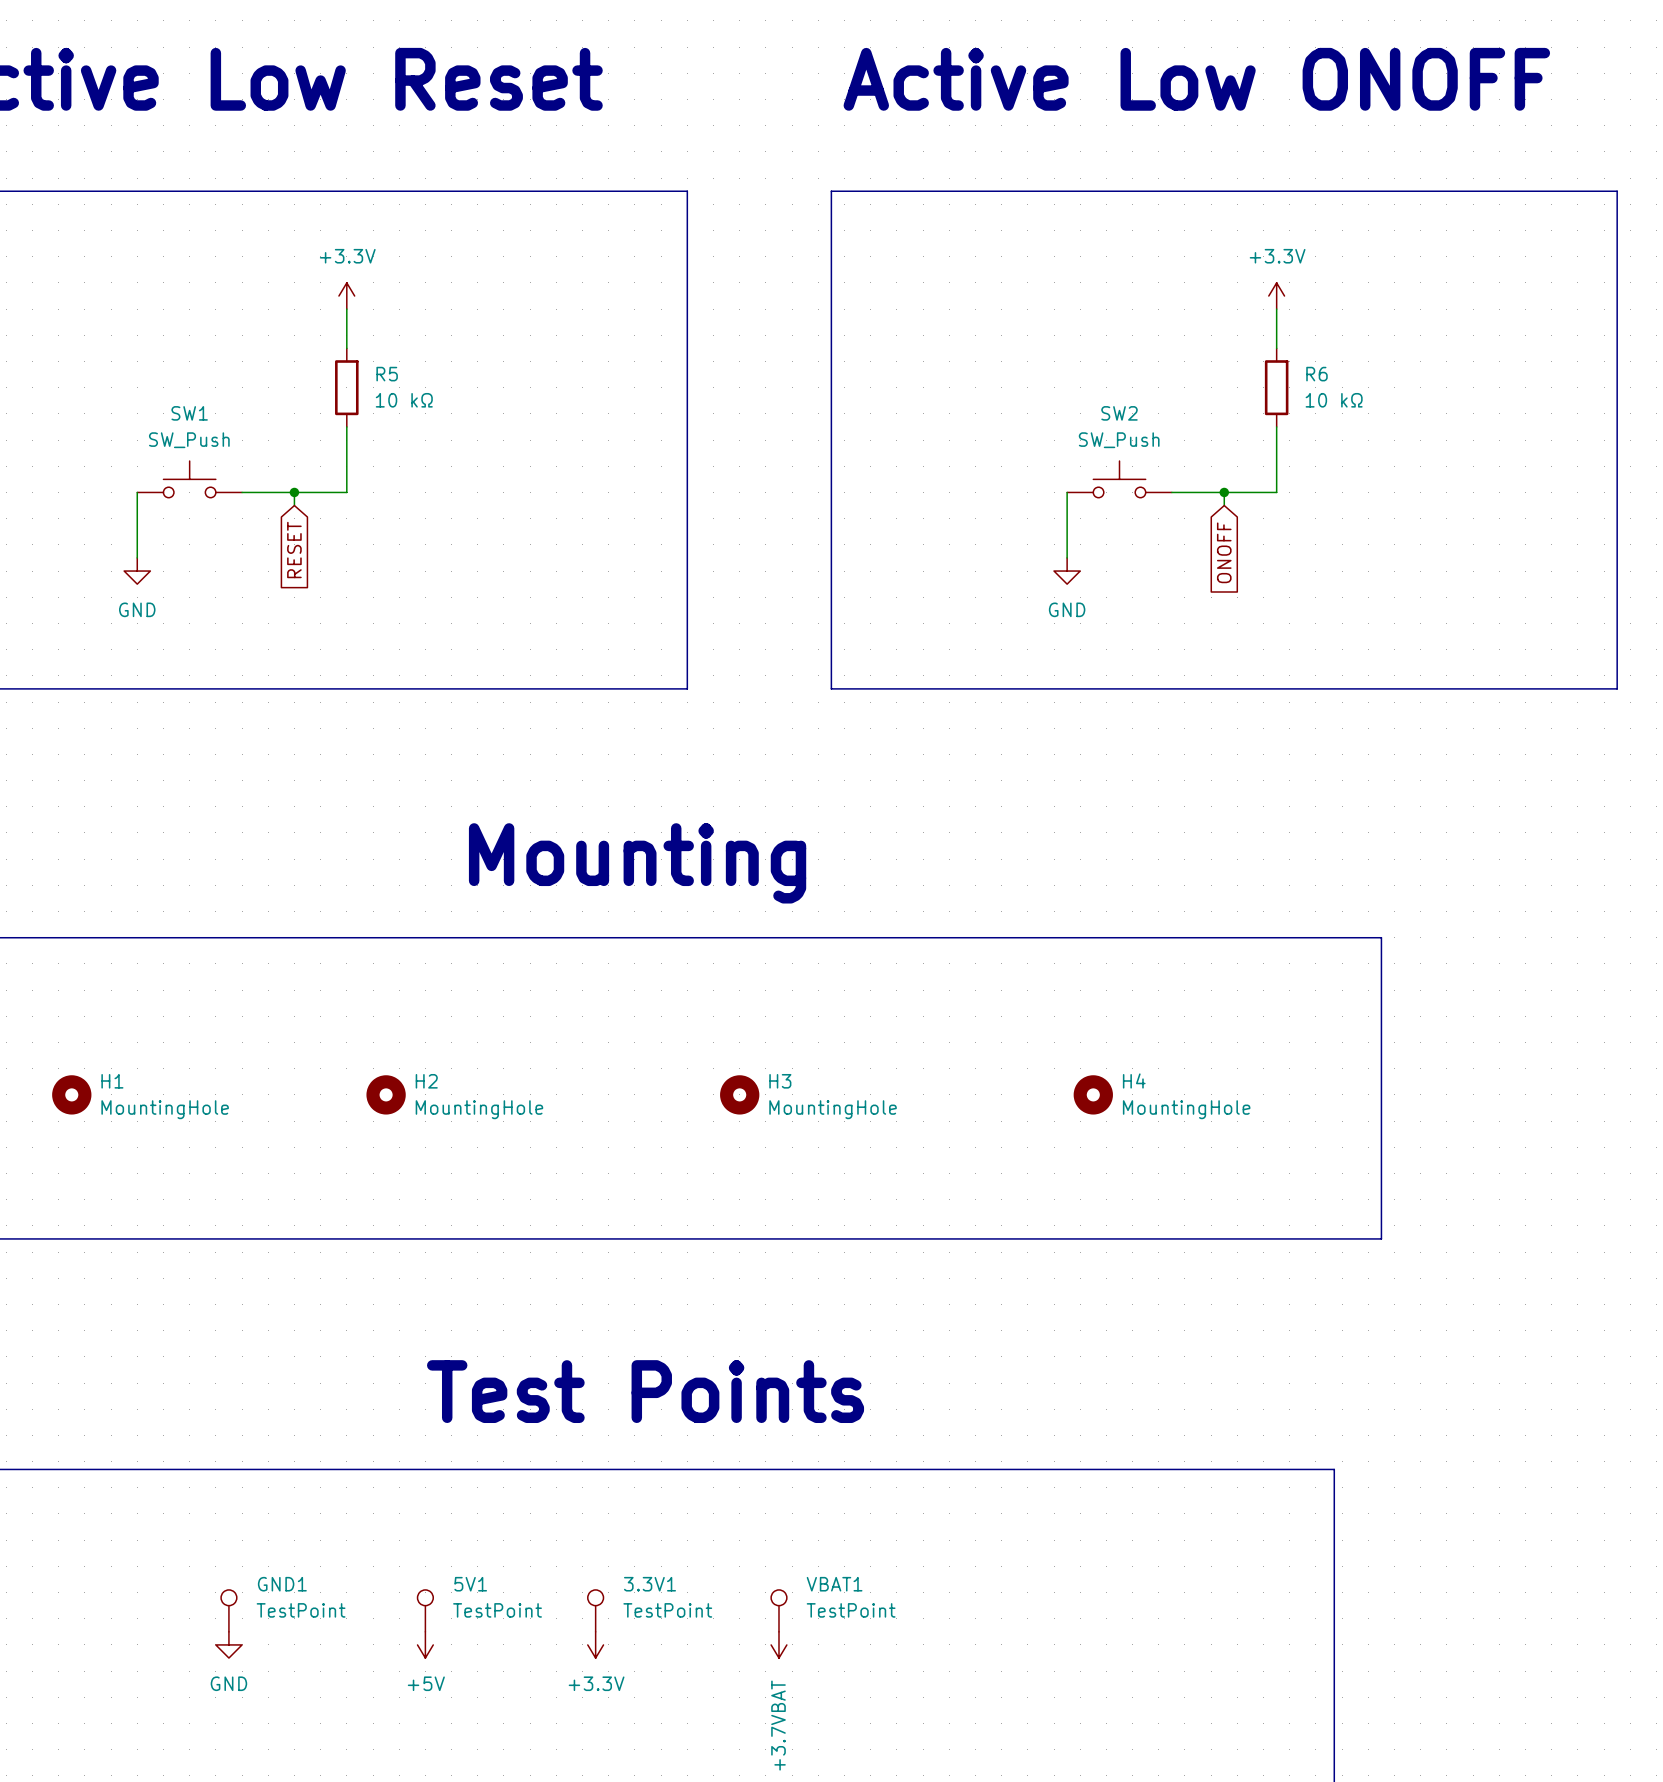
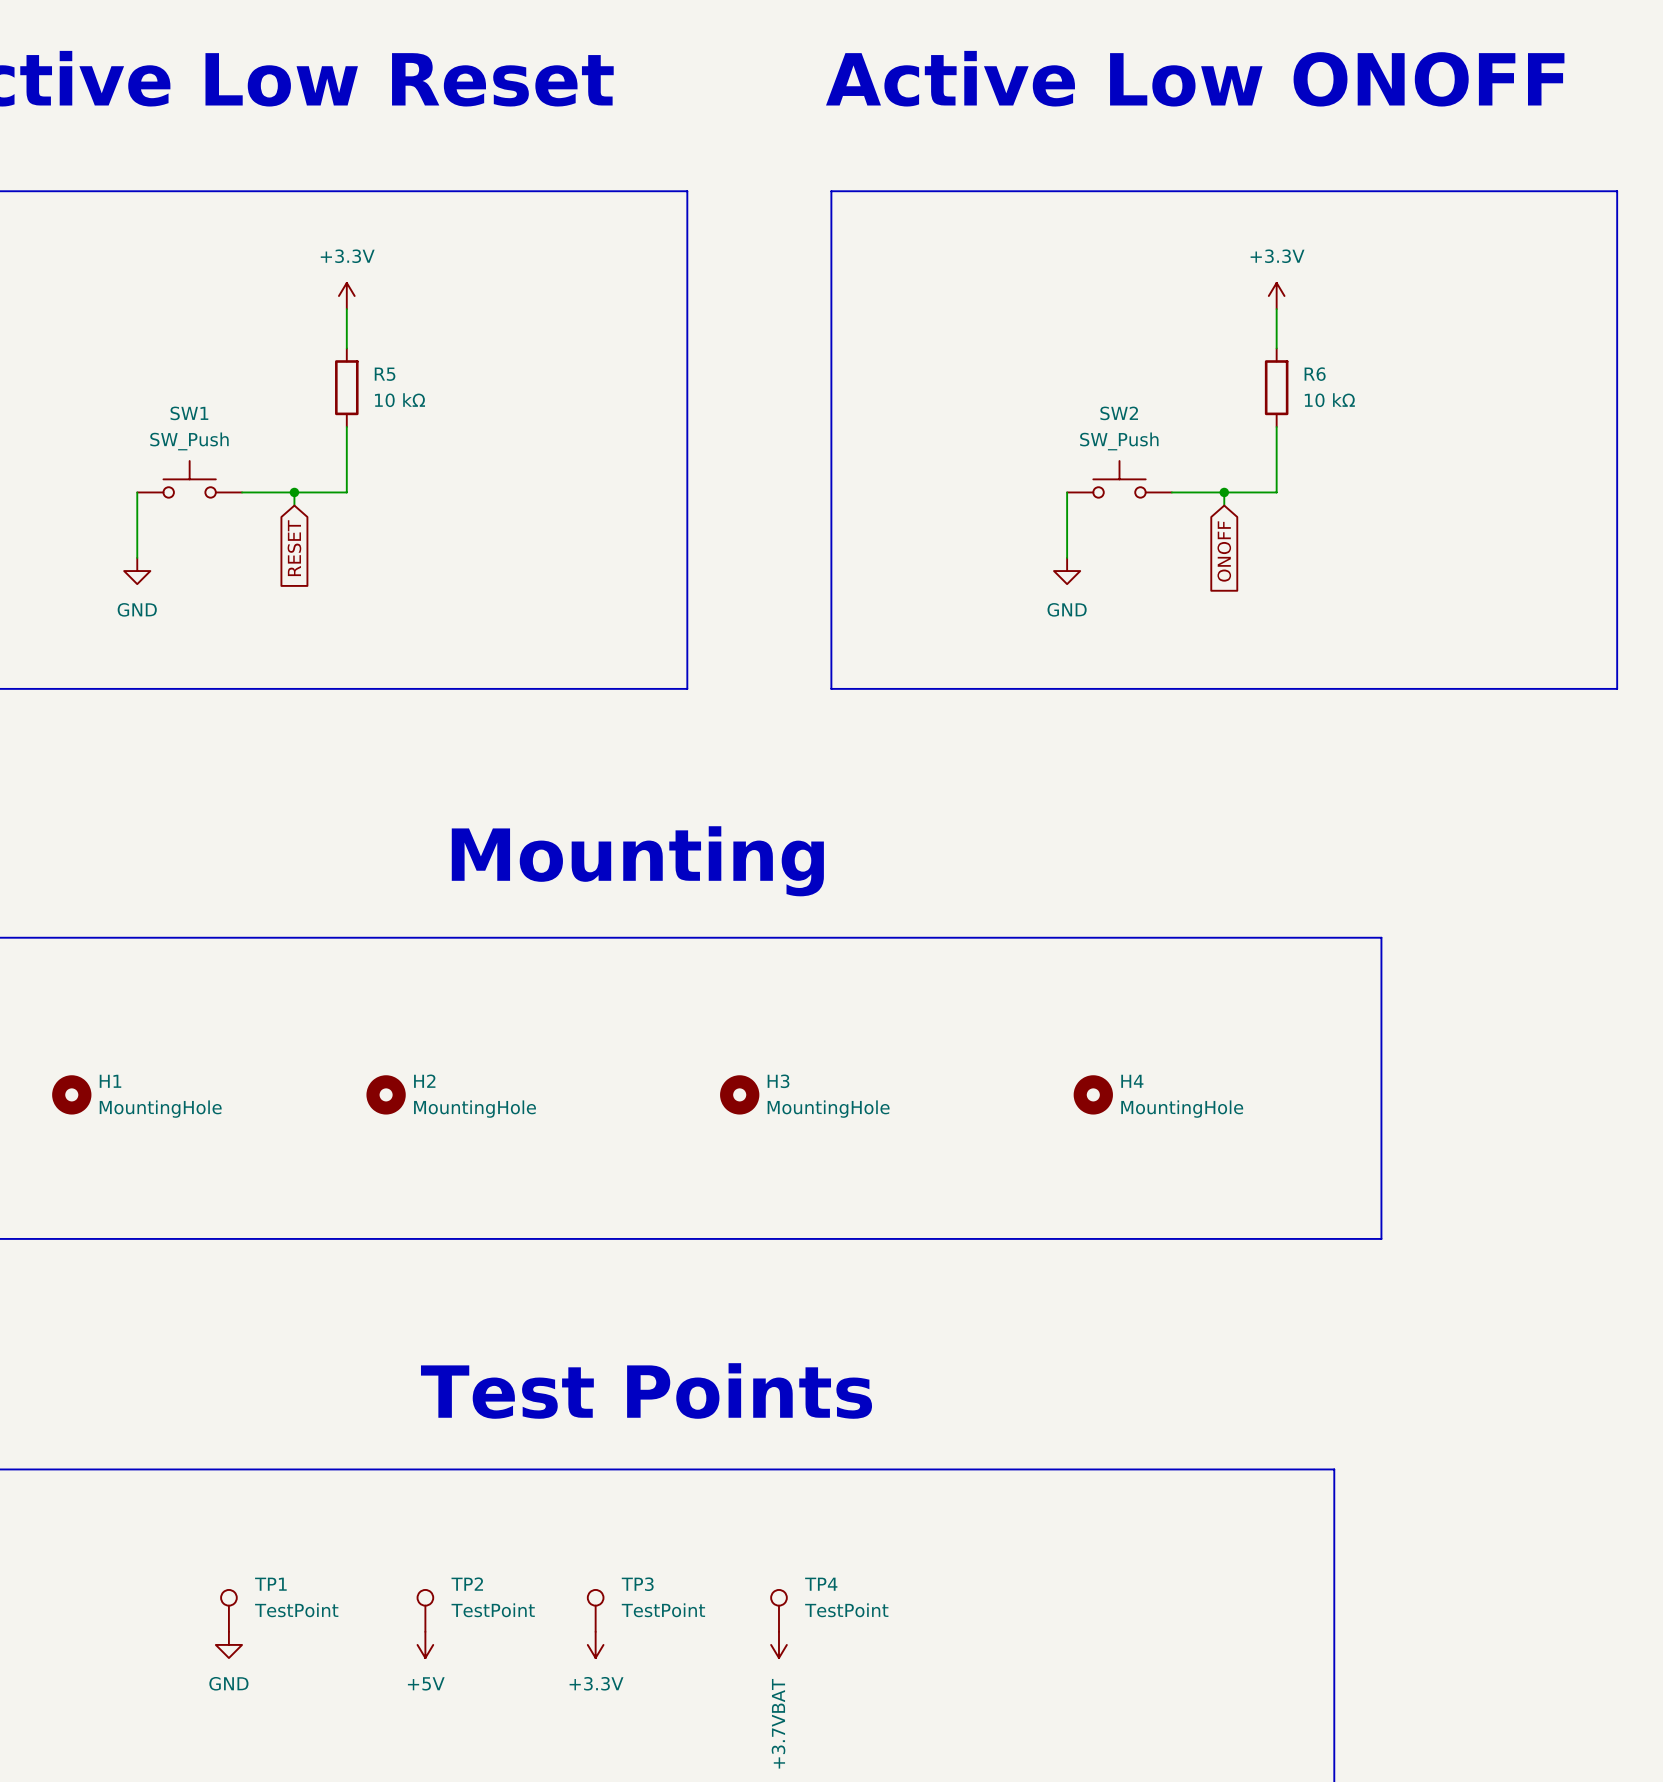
GND1 name: GND1 (282, 1584) -> TP1 (270, 1584)
5V1 name: 5V1 (470, 1584) -> TP2 (467, 1584)
3.3V1 name: 3.3V1 (650, 1584) -> TP3 (637, 1584)
VBAT1 name: VBAT1 (834, 1584) -> TP4 (821, 1584)

